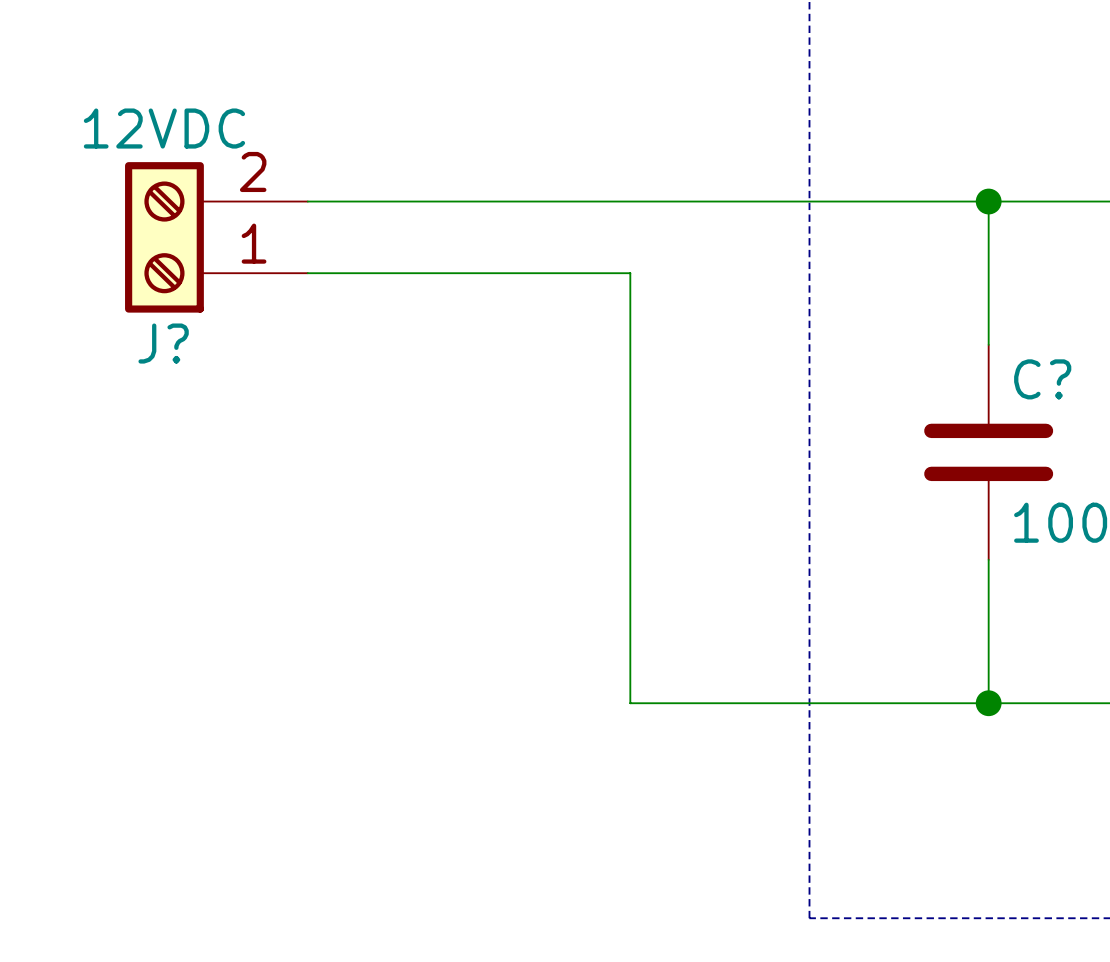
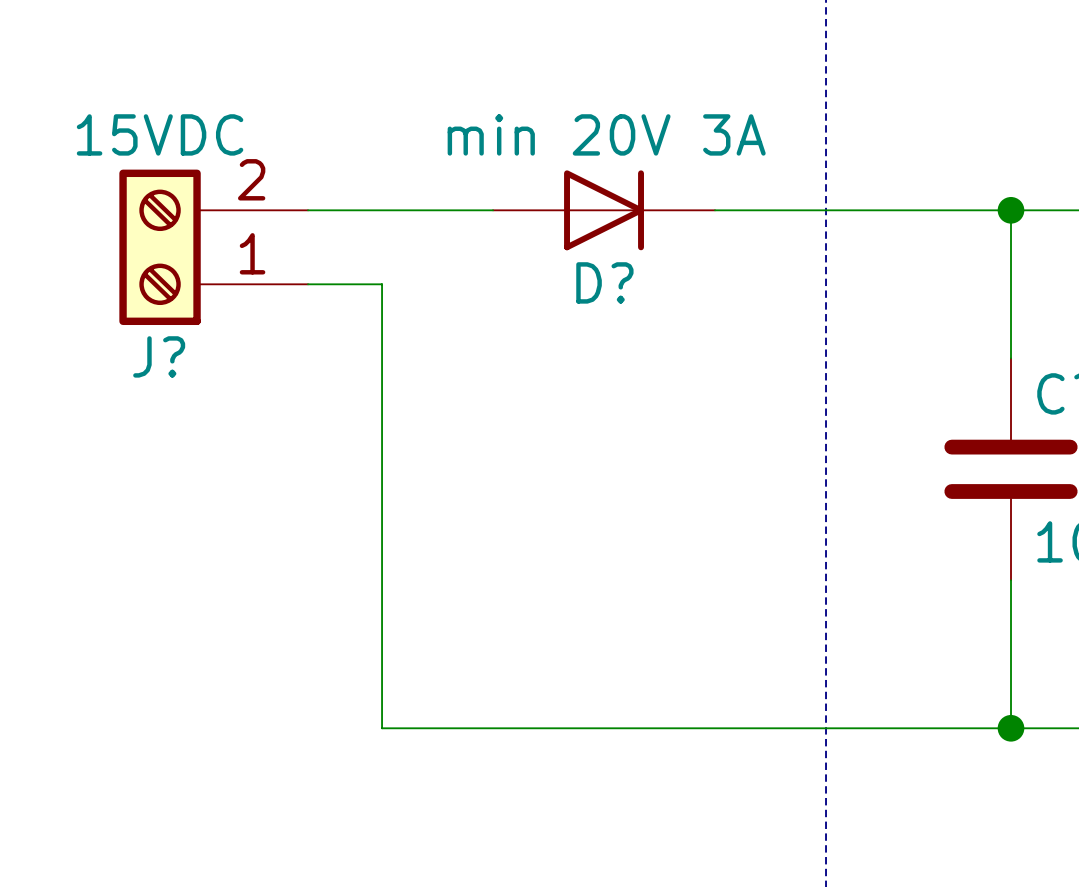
J? value: 12VDC (164, 128) -> 15VDC (160, 134)
D?: none -> min 20V 3A (604, 210)
wire: (379, 273) (630, 273) (630, 703) -> (382, 284) (382, 728) (641, 728)

